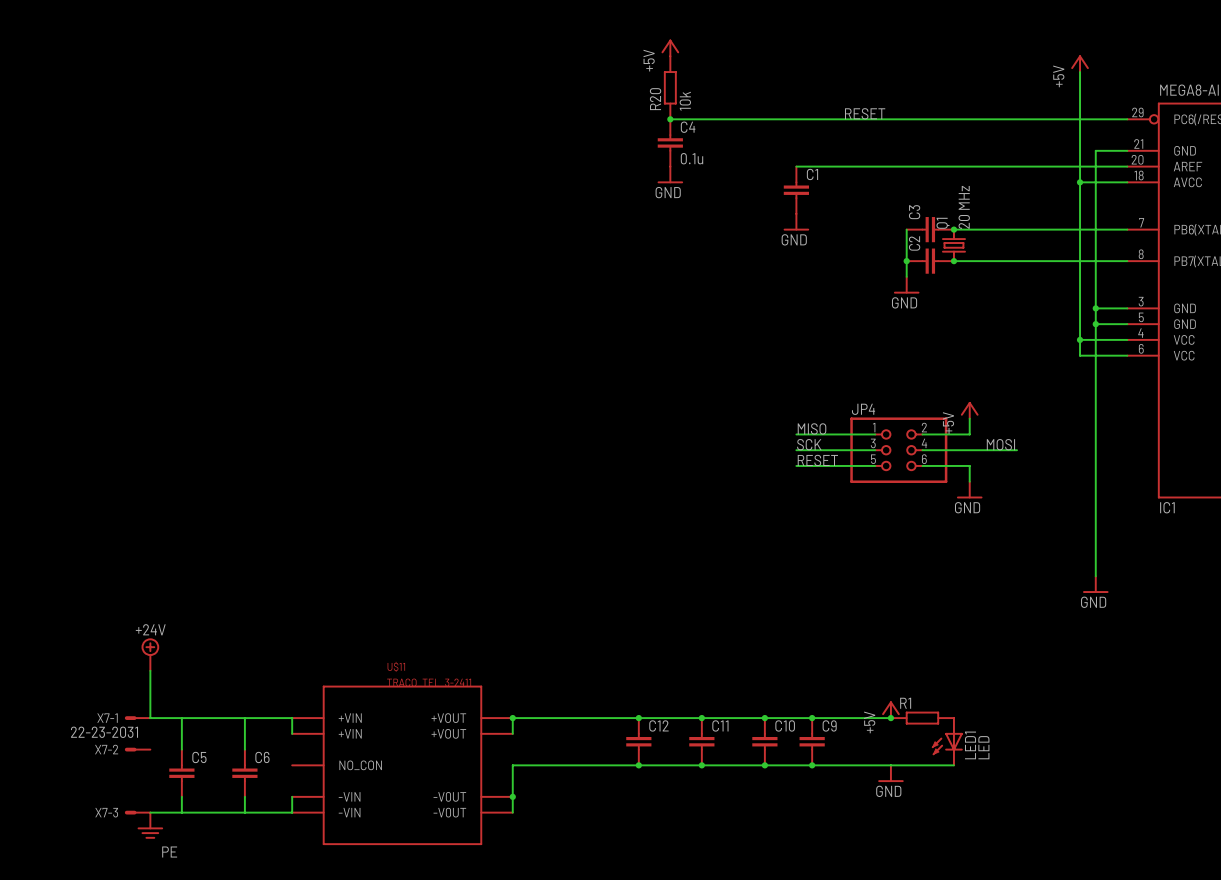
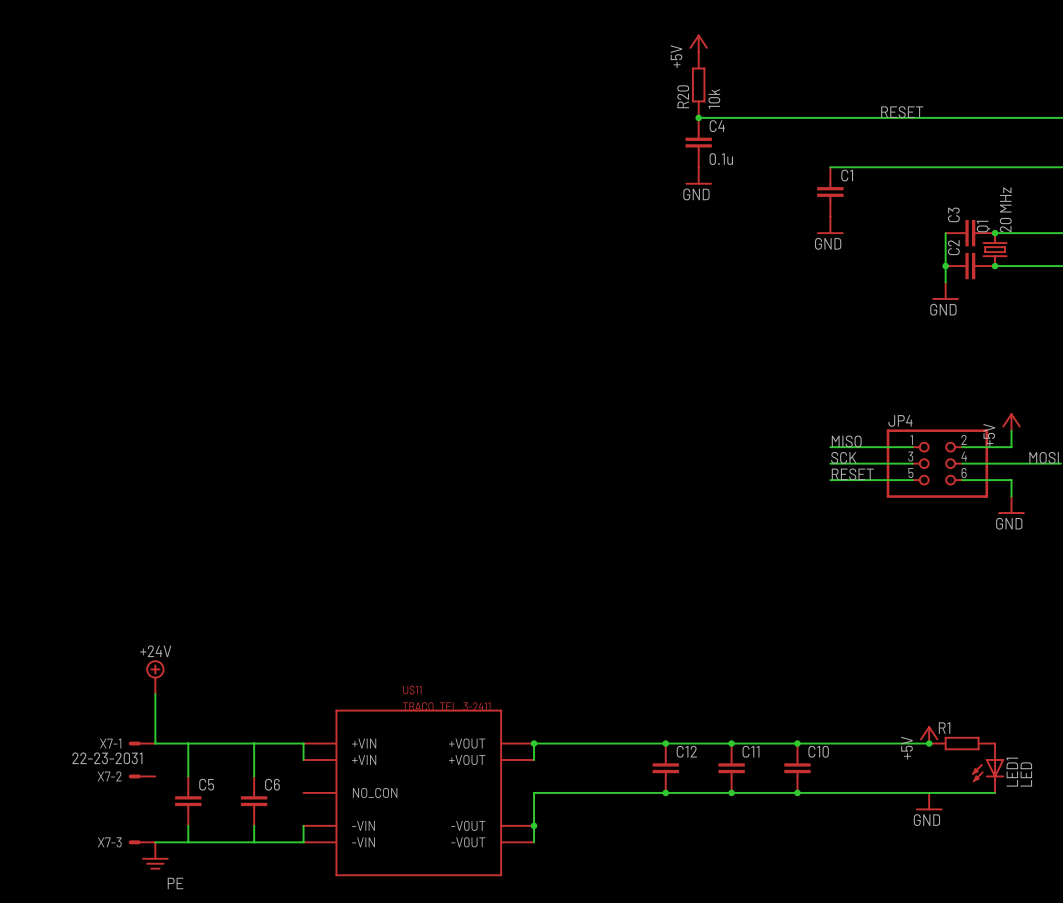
junction: (812, 718) -> none
C9: (812, 741) -> none
junction: (812, 765) -> none

